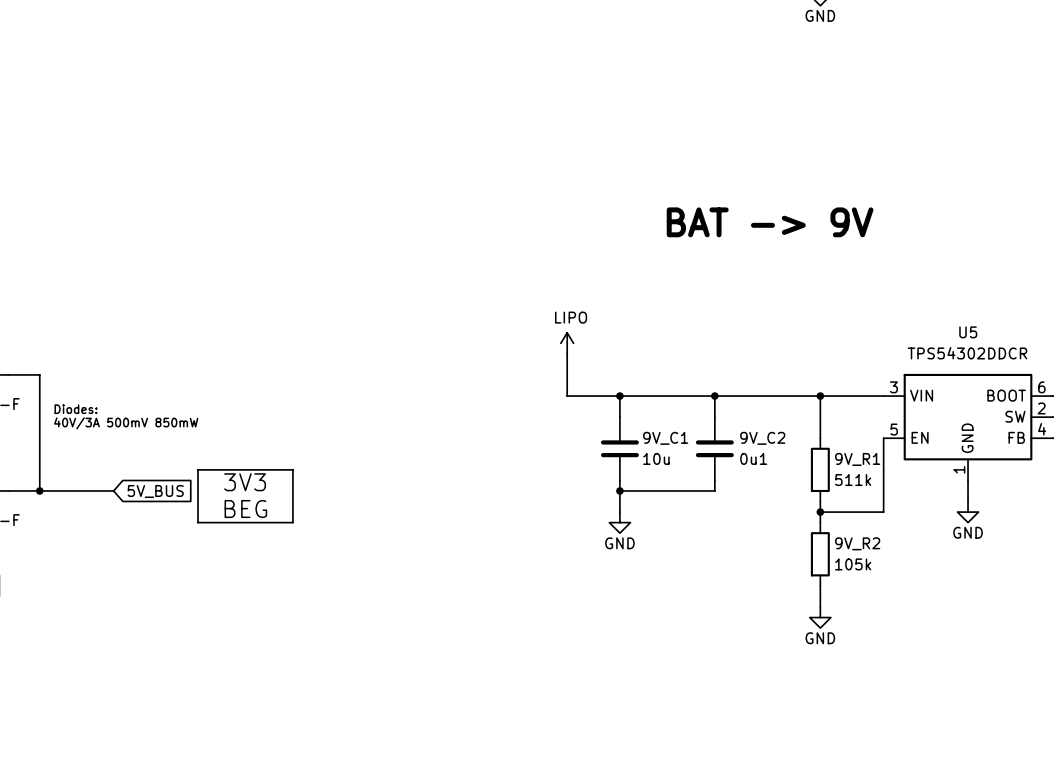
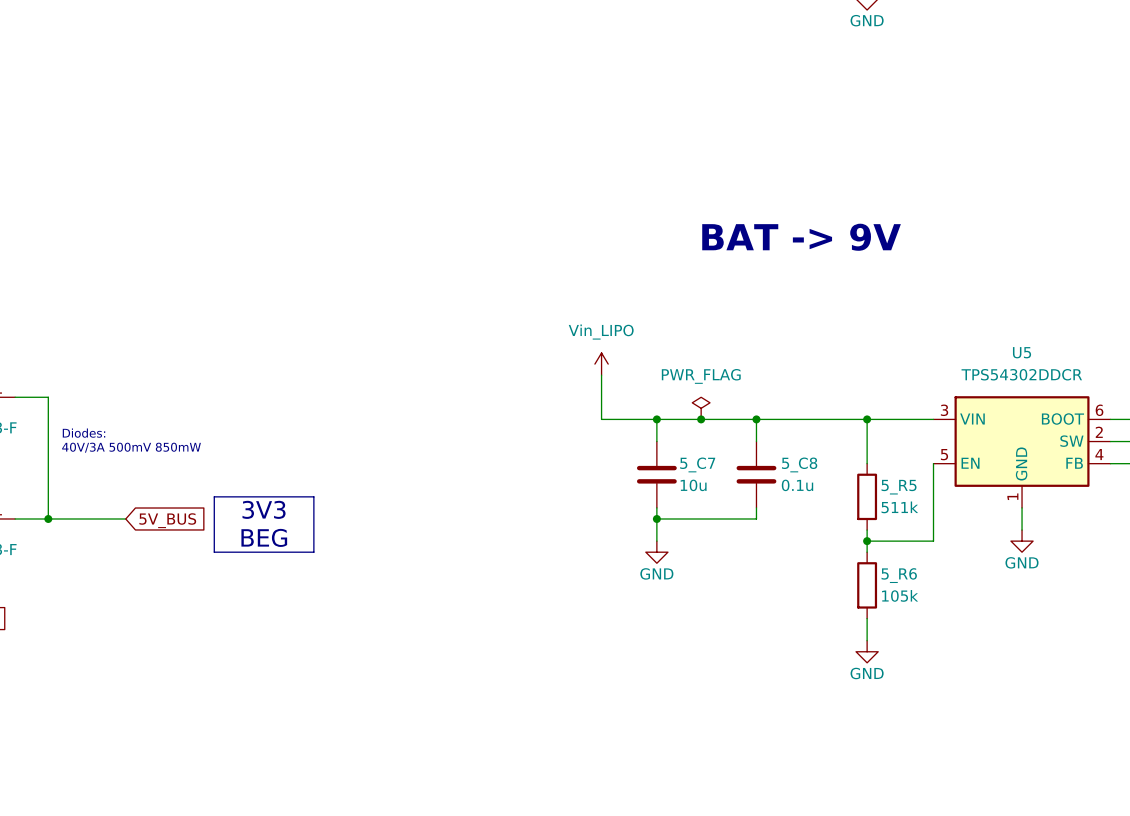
power symbol: LIPO (567, 343) -> Vin_LIPO (601, 364)
power symbol: none -> PWR_FLAG (701, 408)
junction: none -> (701, 419)
9V_C1 name: 9V_C1 (665, 438) -> 5_C7 (697, 464)
9V_C2 name: 9V_C2 (762, 438) -> 5_C8 (799, 464)
9V_C2 value: 0u1 (753, 458) -> 0.1u (797, 485)
9V_R1 name: 9V_R1 (857, 459) -> 5_R5 (899, 487)
9V_R2 name: 9V_R2 (857, 543) -> 5_R6 (899, 575)

